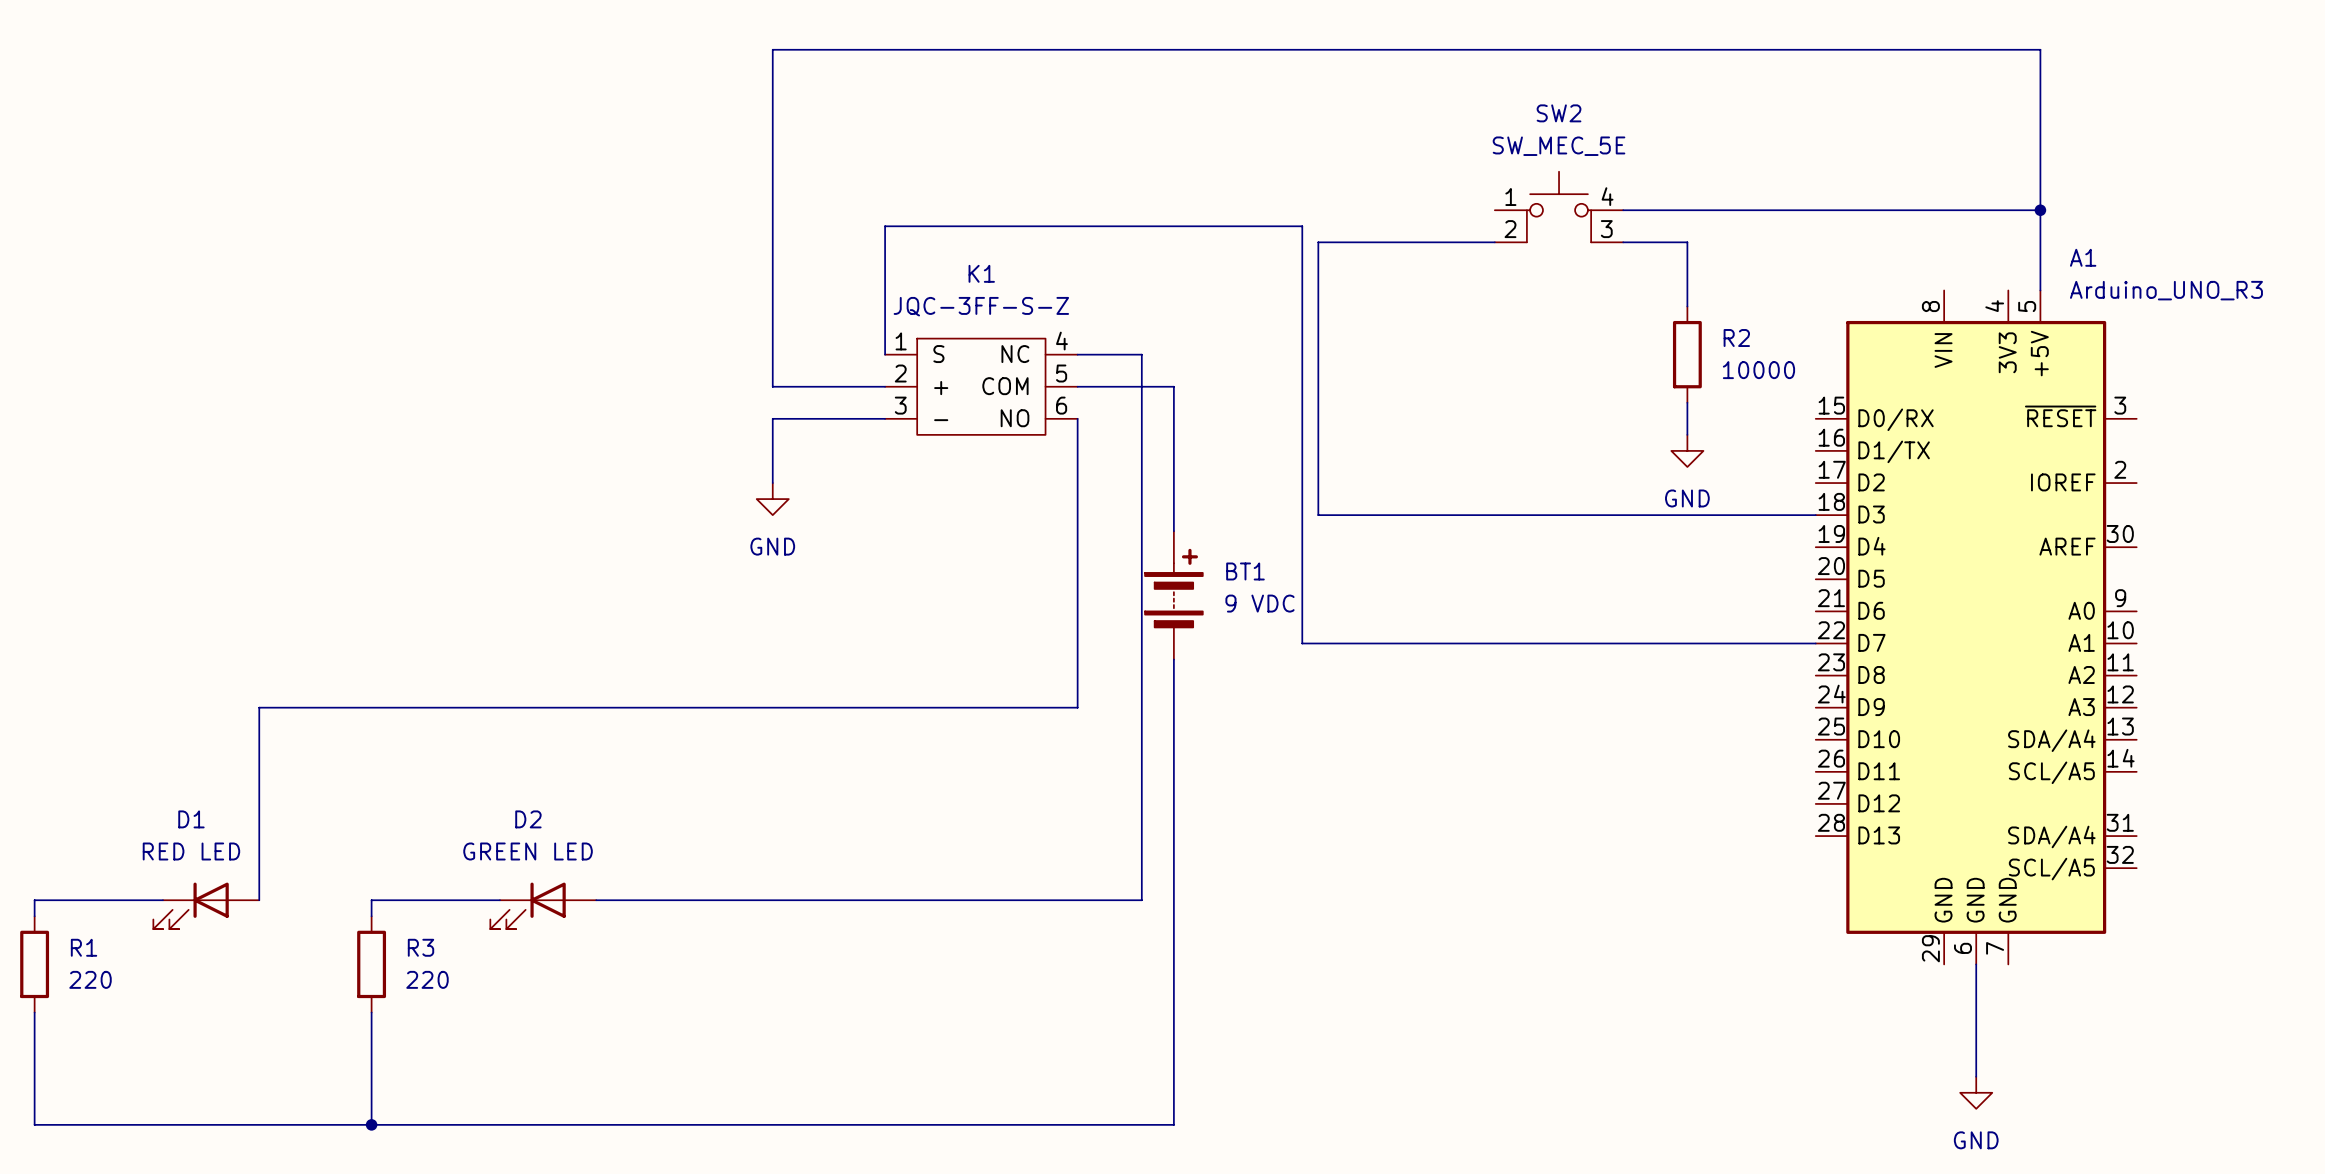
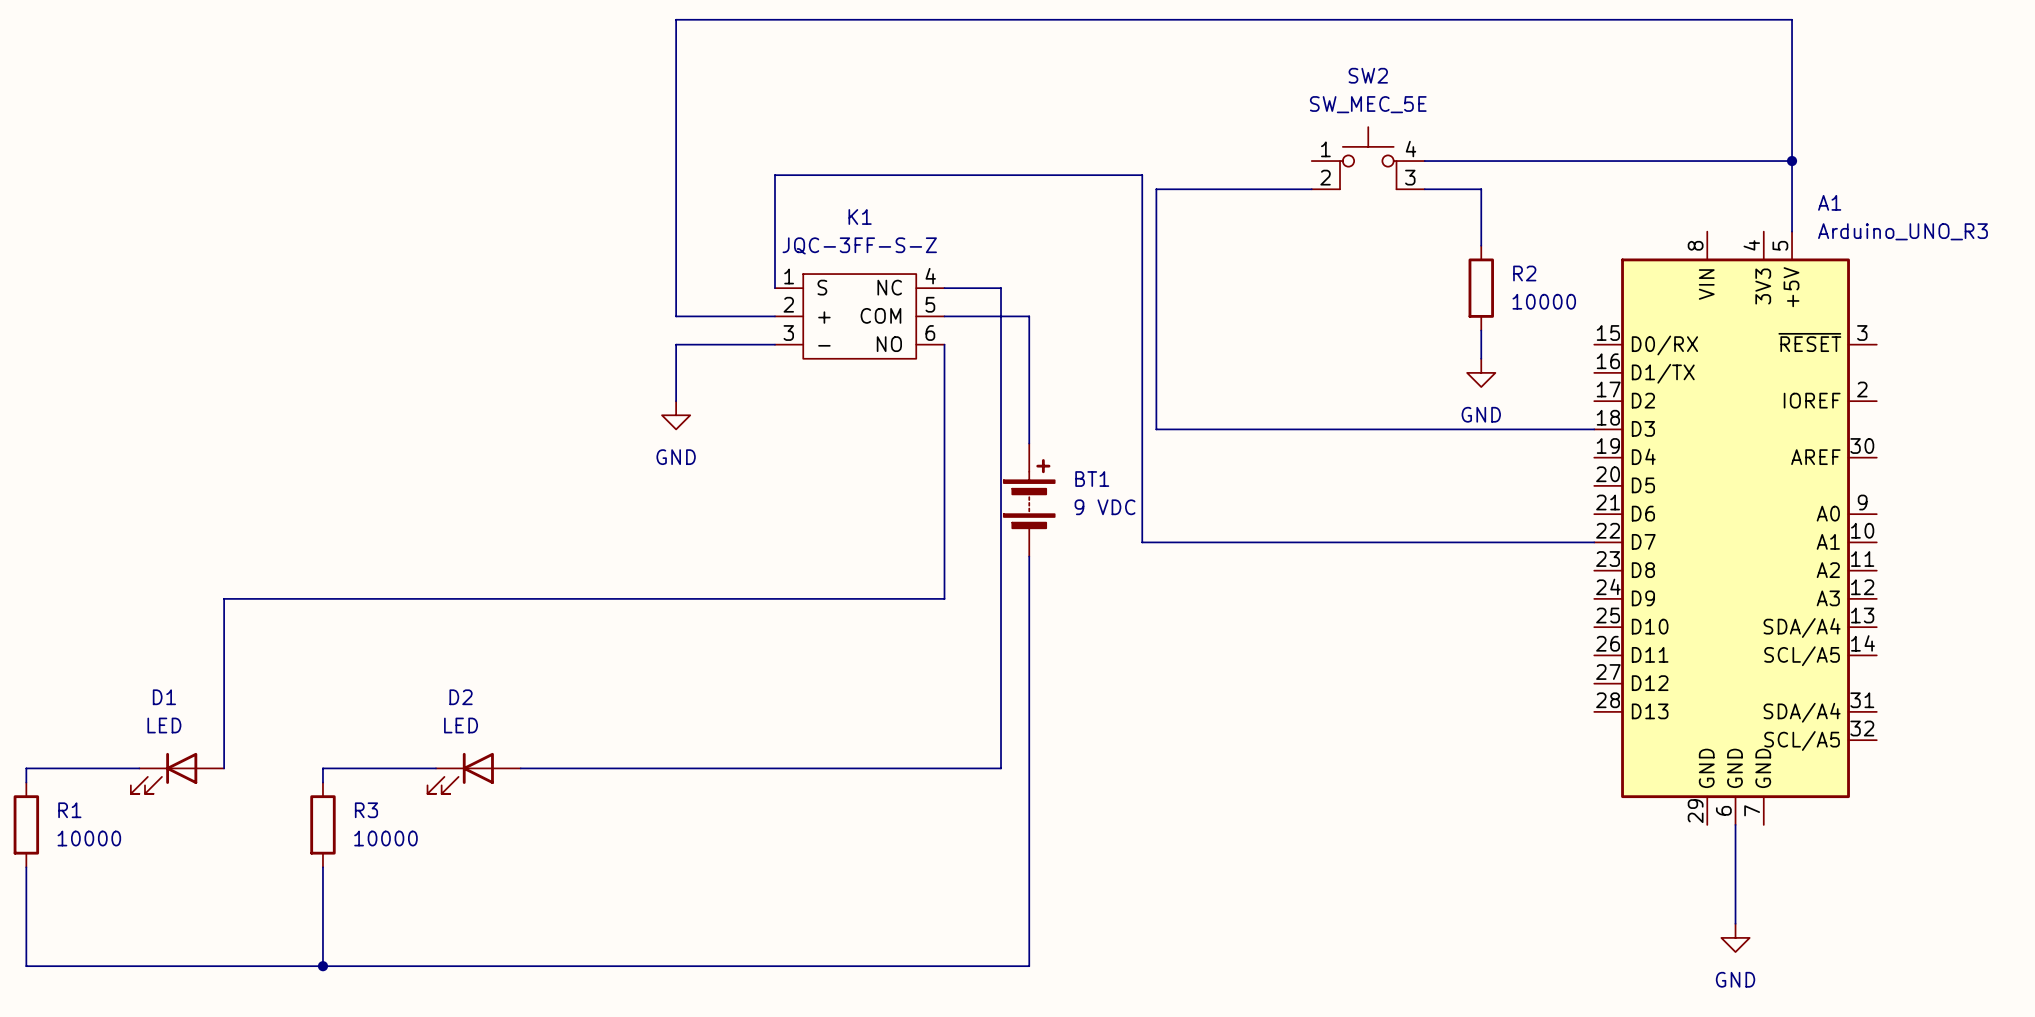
D1 value: RED LED (191, 851) -> LED (164, 725)
D2 value: GREEN LED (528, 851) -> LED (461, 725)
R1 value: 220 (90, 979) -> 10000 (89, 838)
R3 value: 220 (427, 979) -> 10000 (385, 838)

